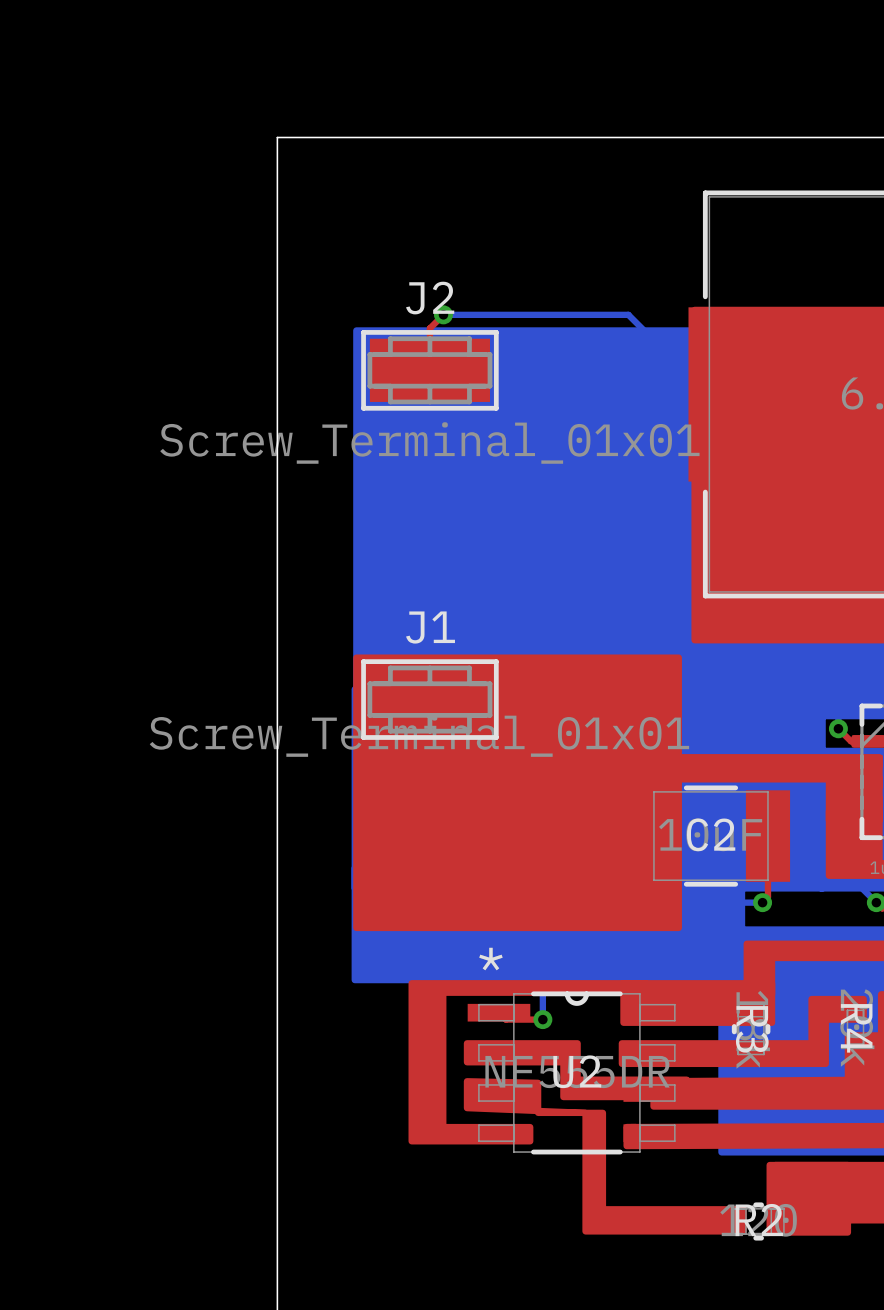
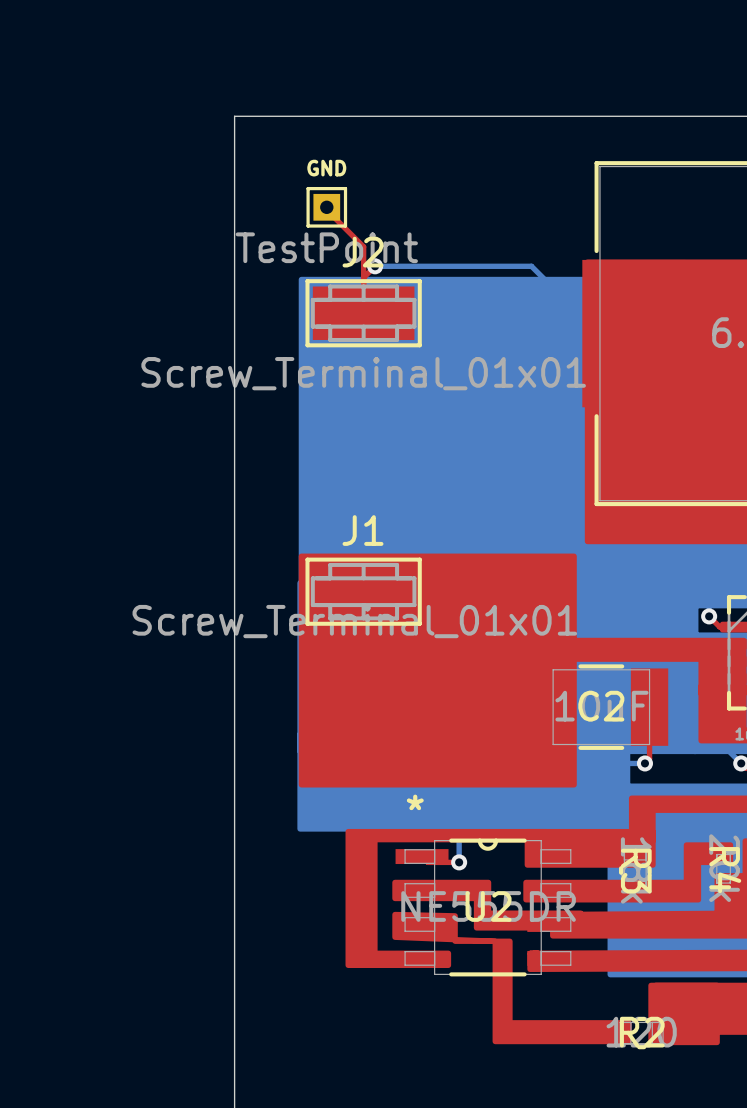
top track: none -> (326, 207) (326, 209) (363, 246) (363, 277)
GND: none -> TestPoint (326, 207)

